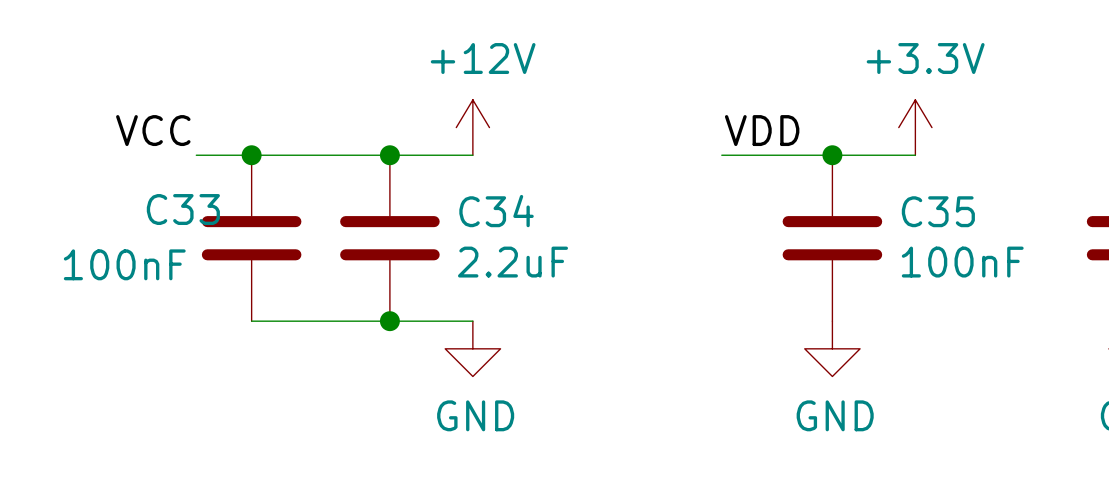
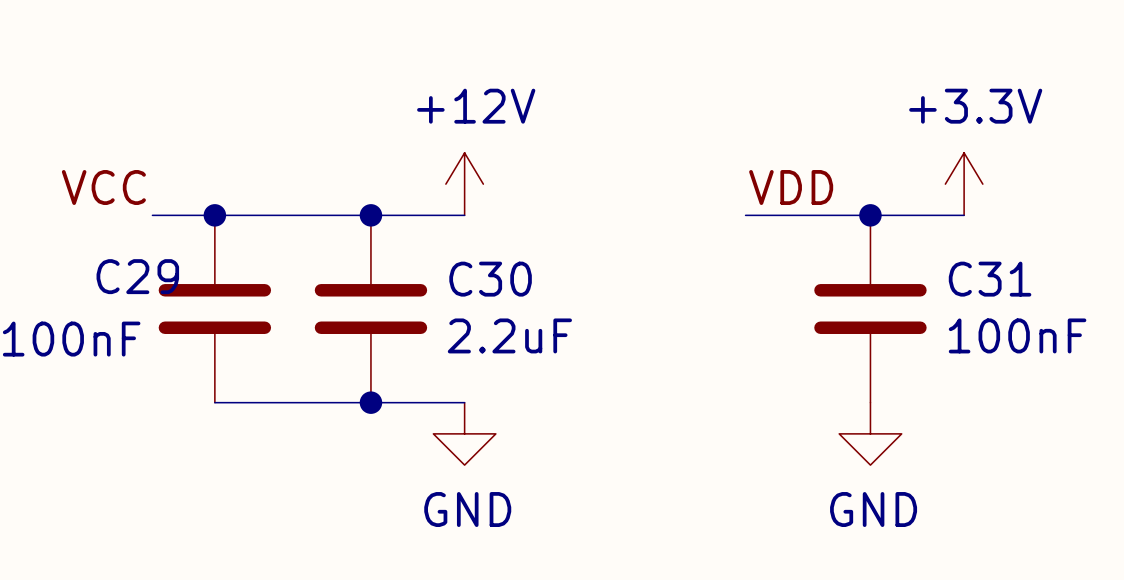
C33 name: C33 (183, 209) -> C29 (137, 276)
C34 name: C34 (496, 211) -> C30 (490, 279)
C35 name: C35 (938, 211) -> C31 (990, 279)

